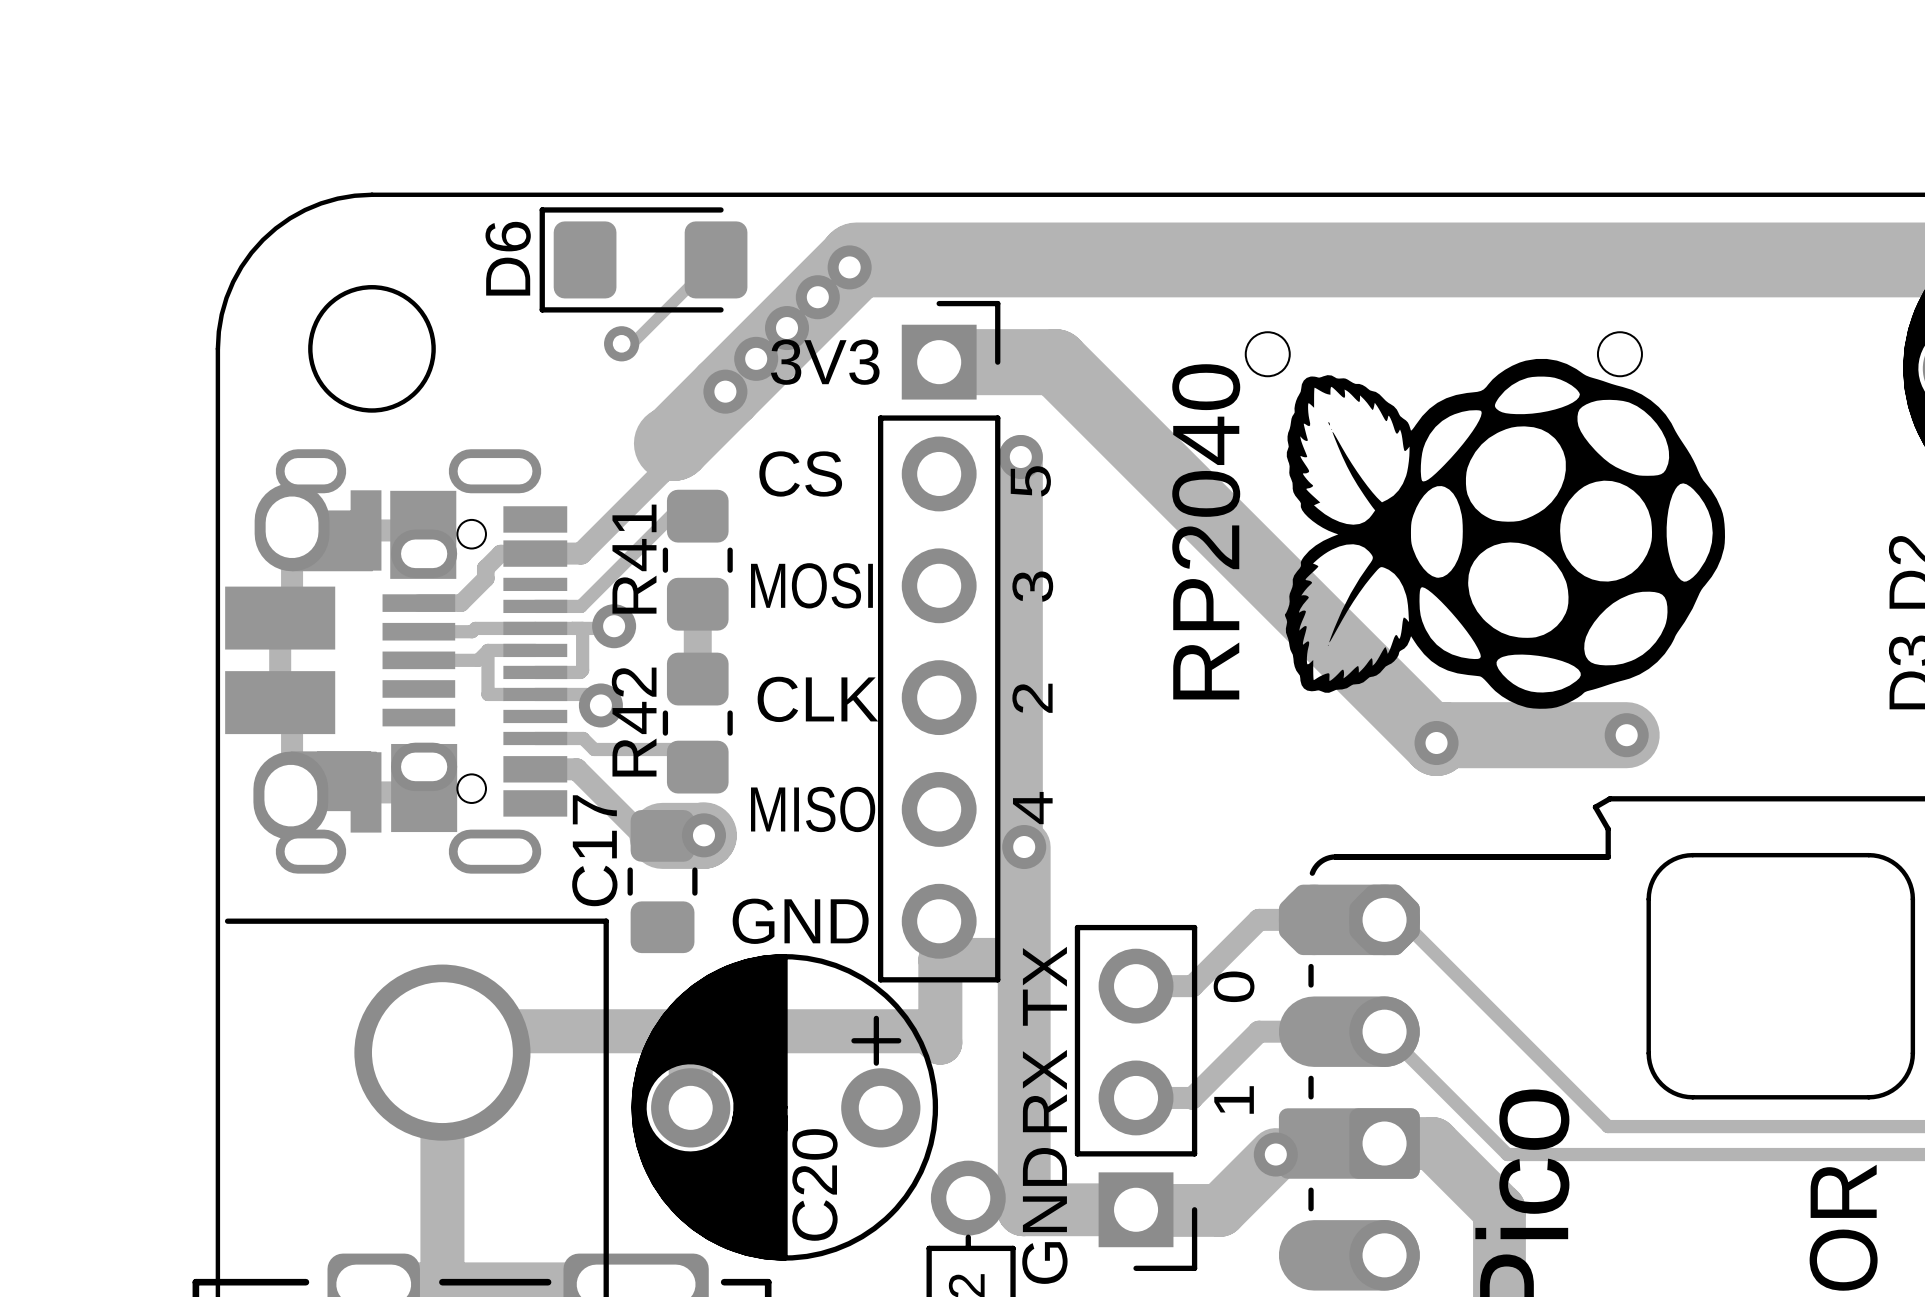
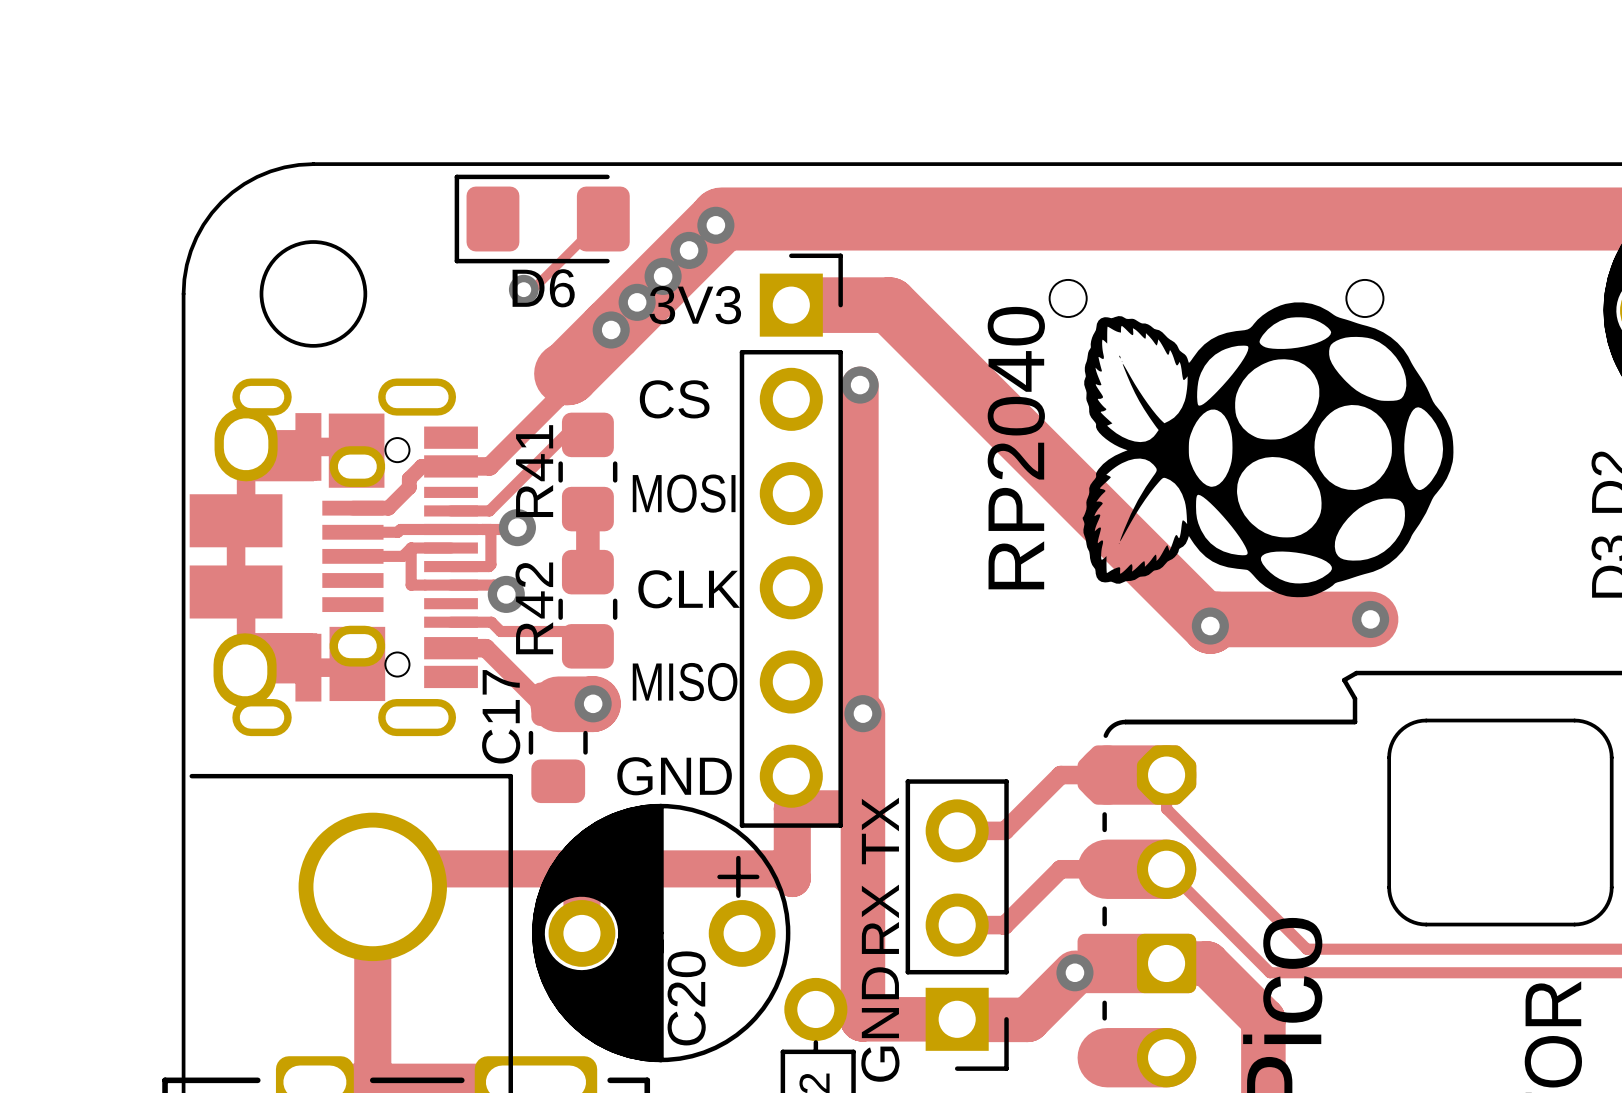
D6 name rotation: 0° (508, 258) -> 90° clockwise (543, 288)
D6 name position: D6 (508, 258) -> D6 (543, 288)
text: 5 (1030, 481) -> none
text: 3 (1032, 586) -> none
text: 2 (1032, 698) -> none
text: 4 (1032, 808) -> none
track: (1384, 919) (1401, 919) (1607, 1126) -> (1166, 775) (1166, 808) (1306, 949) (1354, 949)
text: 0 (1234, 986) -> none
text: 1 (1234, 1099) -> none

